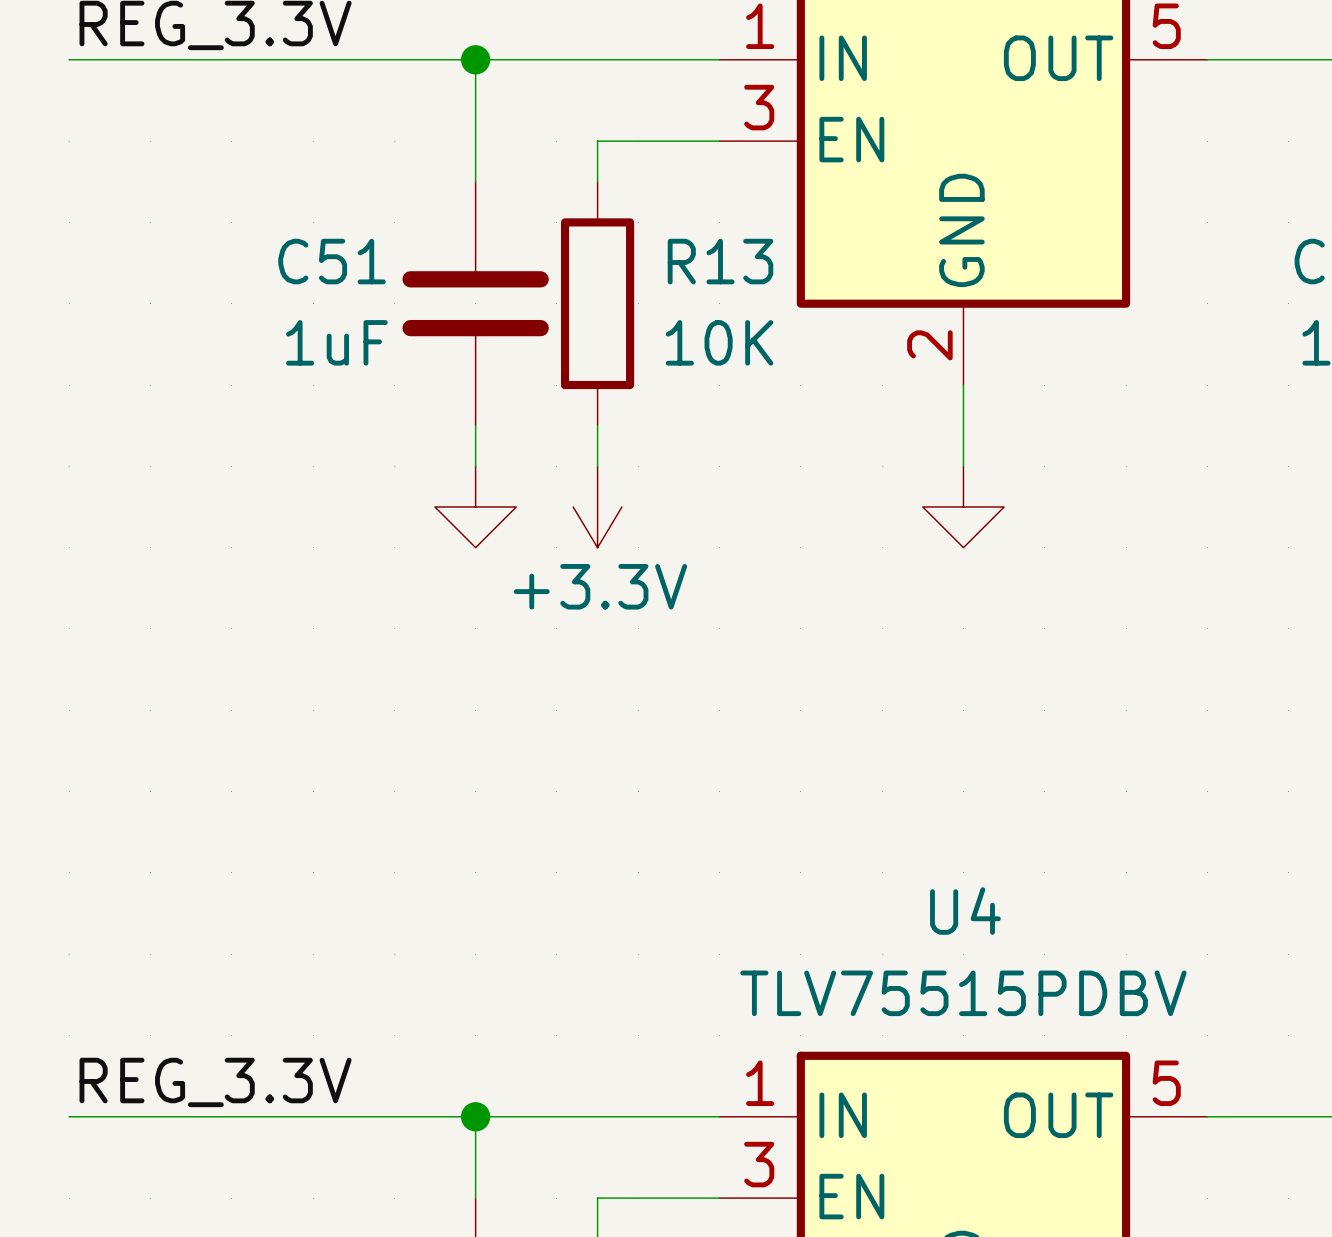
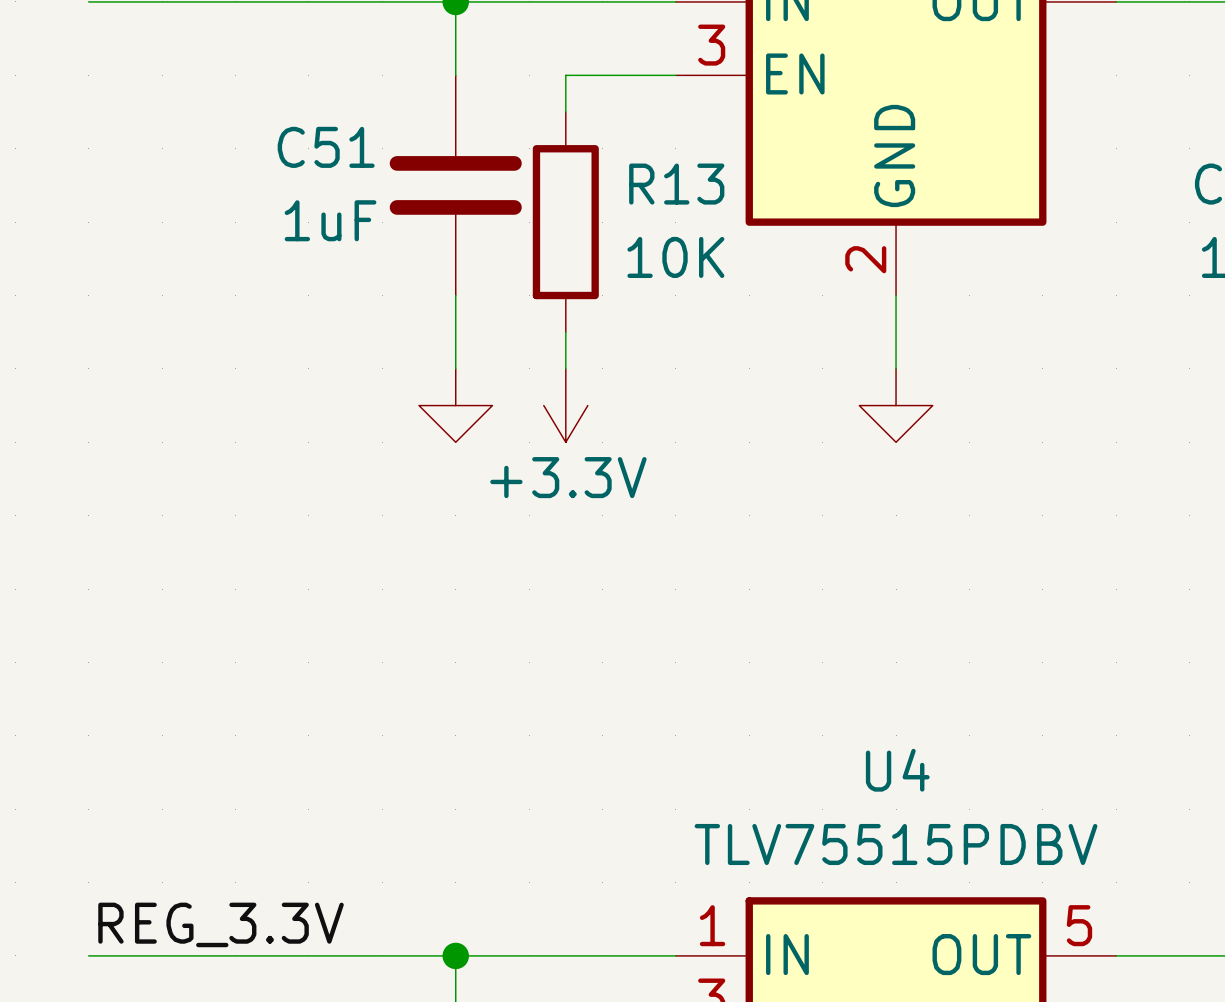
C51 position: (475, 303) -> (455, 185)

